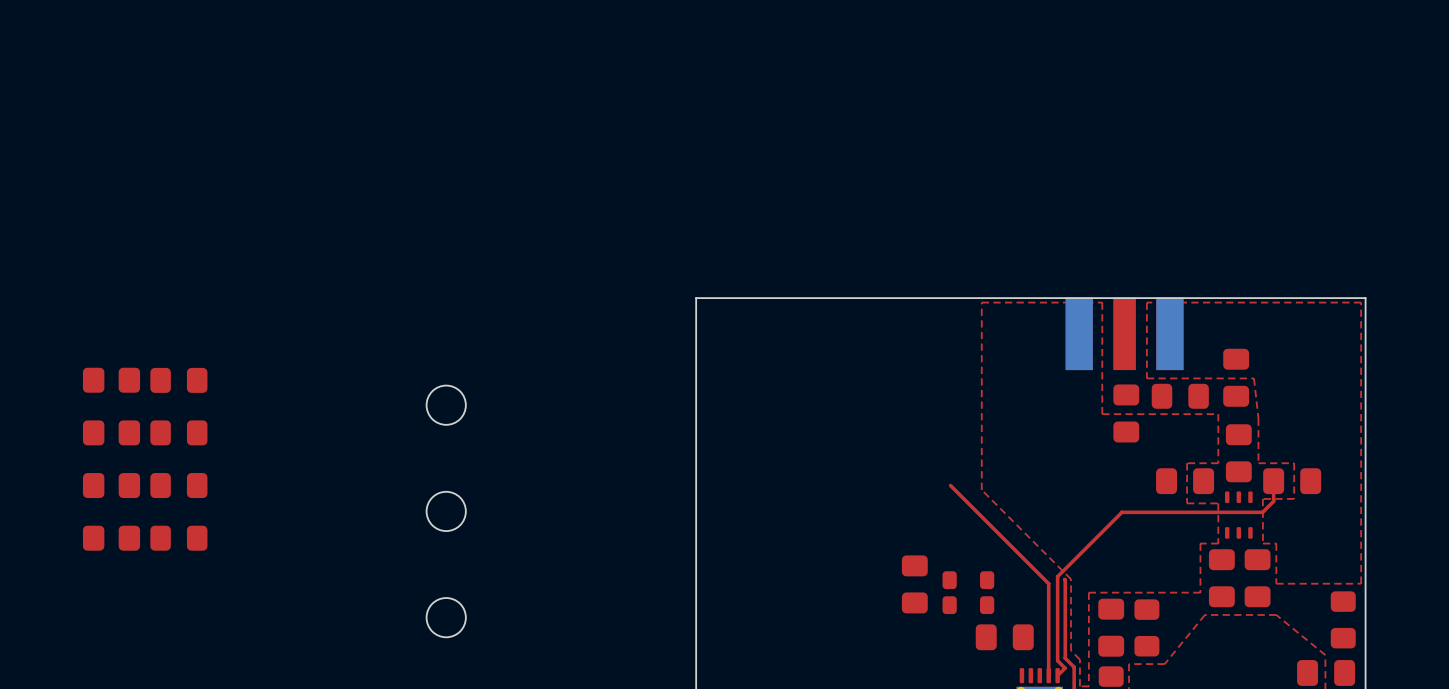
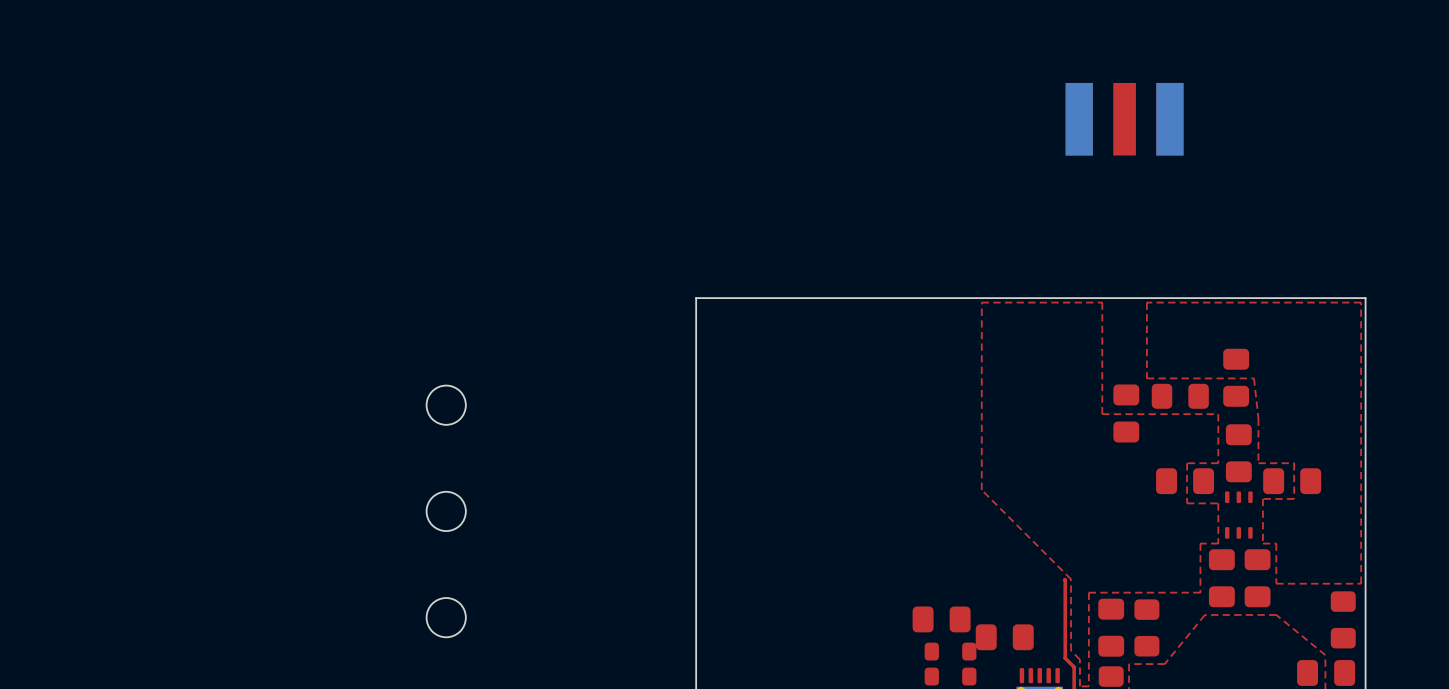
part position: (1124, 333) -> (1124, 119)
part: (111, 380) -> none
part: (178, 380) -> none
part: (111, 432) -> none
part: (178, 432) -> none
top track: (1273, 481) (1273, 501) (1262, 512) (1121, 512) (1057, 576) (1057, 660) (1065, 668) (1057, 675) -> none
part: (111, 485) -> none
part: (178, 485) -> none
top track: (950, 485) (1048, 583) (1048, 675) -> none
part: (111, 538) -> none
part: (178, 538) -> none
part rotation: 0° (914, 584) -> 90° clockwise (941, 619)
part position: (914, 584) -> (941, 619)
part position: (968, 592) -> (950, 664)

